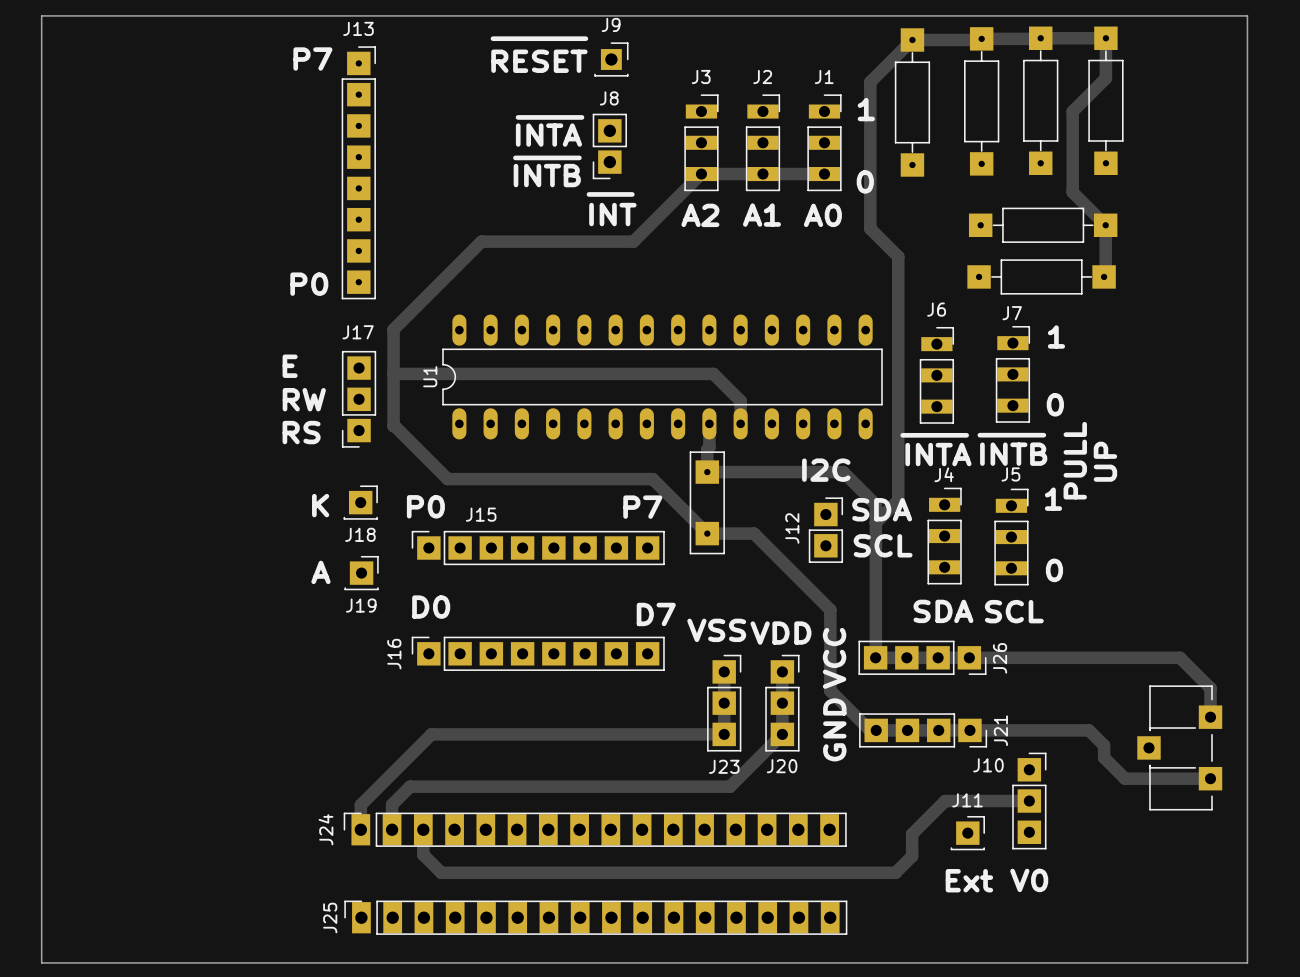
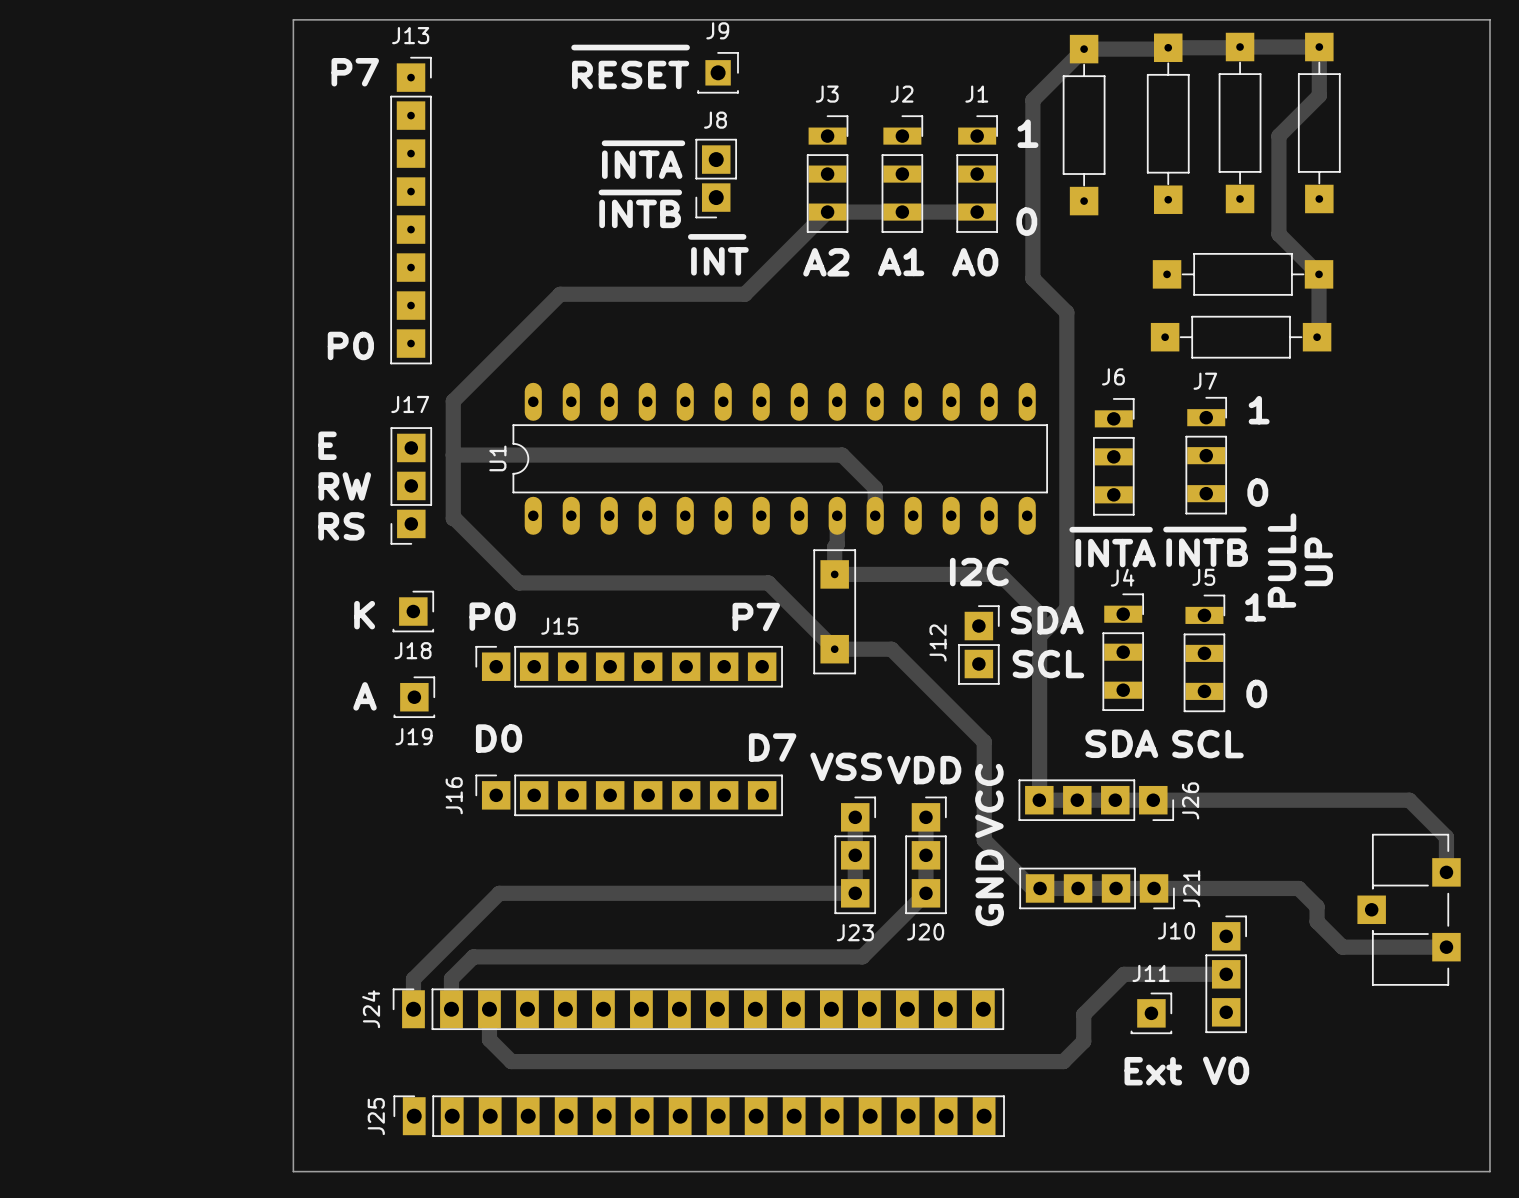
board edge: (262, 15) (41, 15) (41, 962) (1247, 962) (1246, 15) -> (293, 19) (293, 1171) (1489, 1171) (1489, 19)

